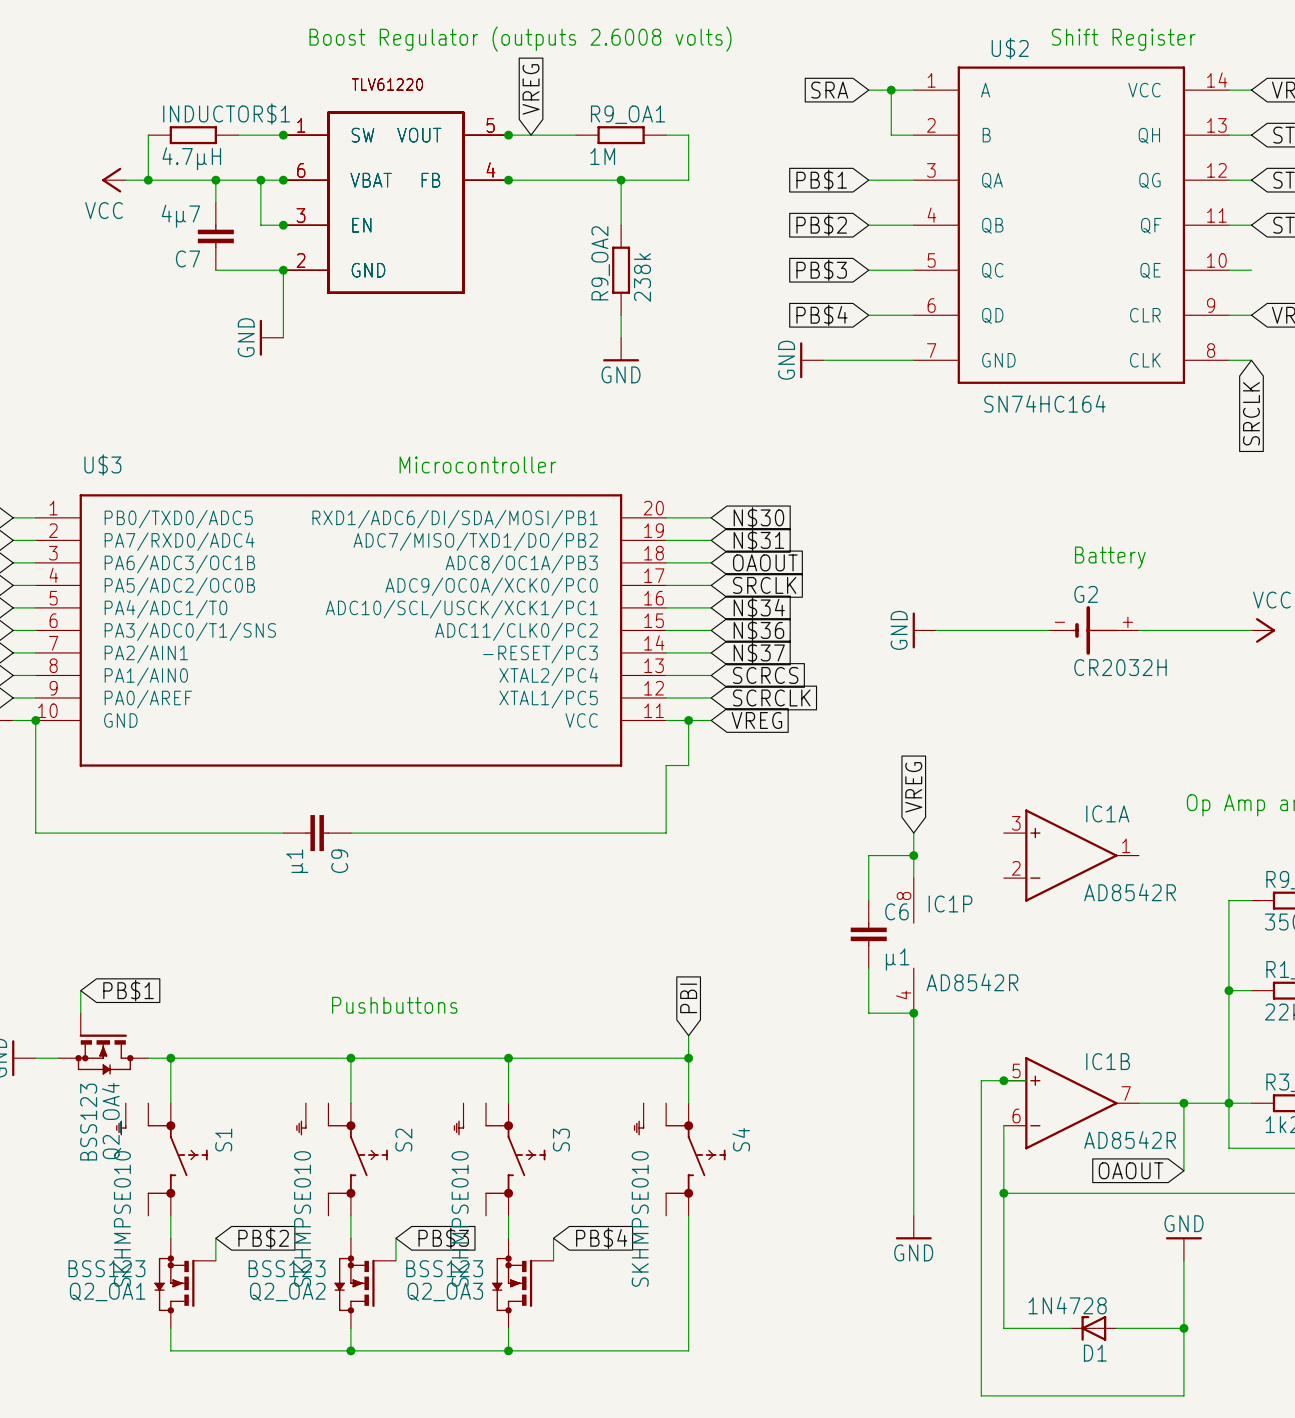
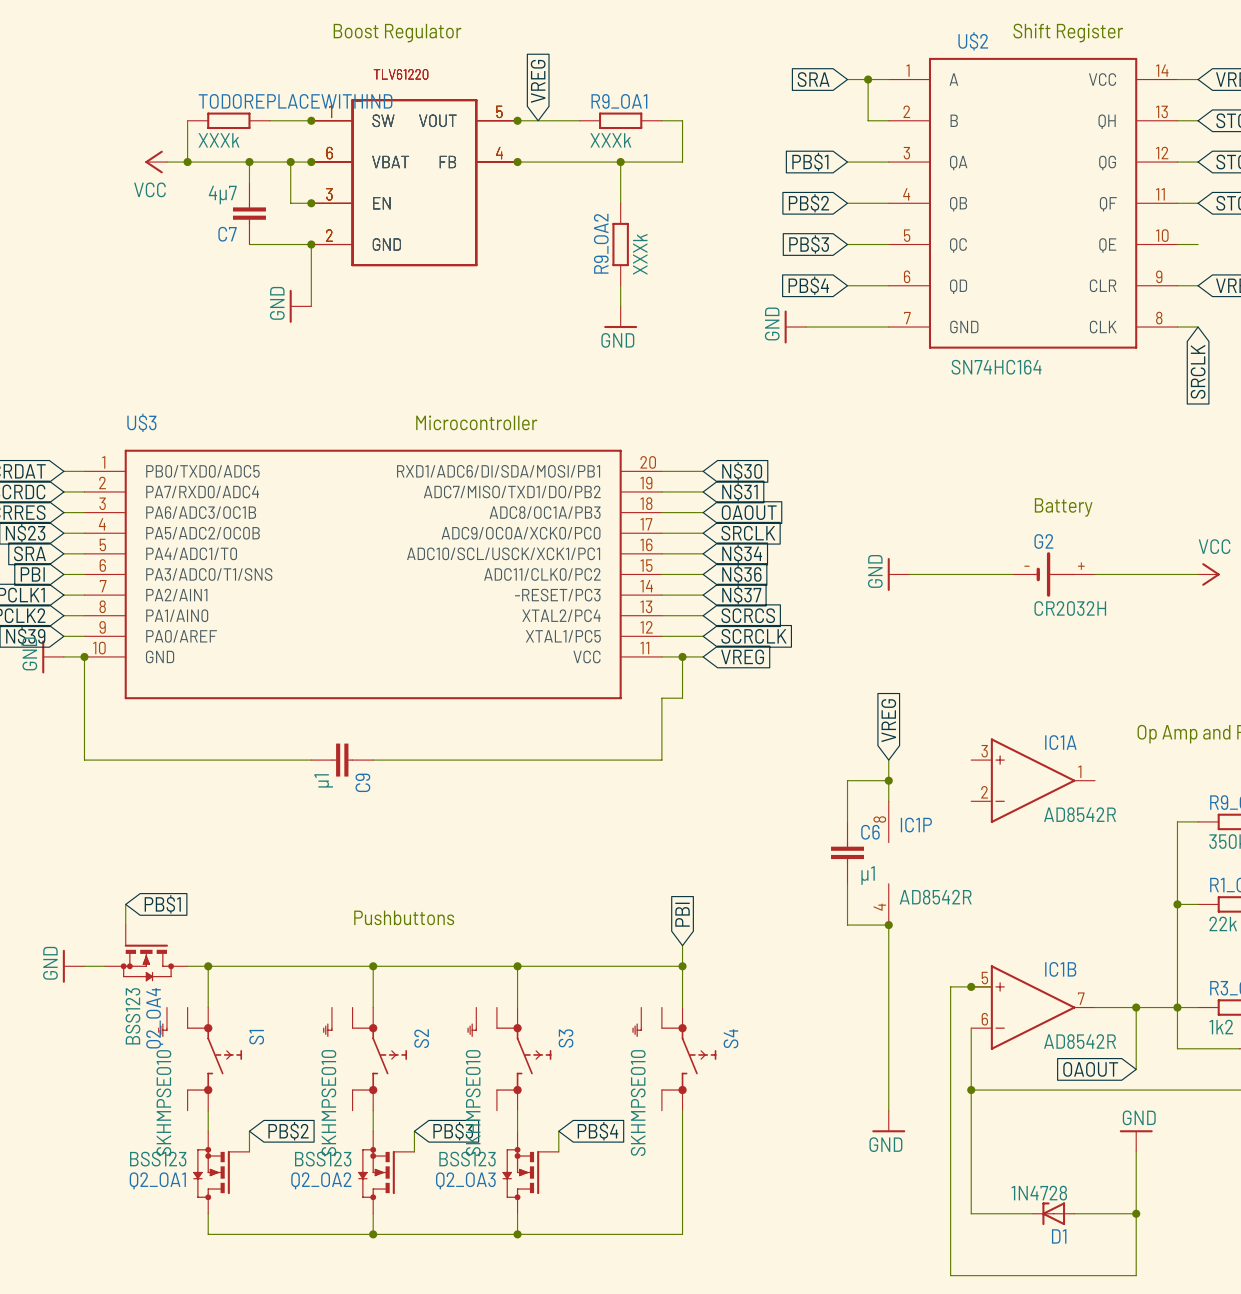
text: Boost Regulator (outputs 2.6008 volts) (520, 39) -> Boost Regulator (397, 33)
INDUCTOR$1 name: INDUCTOR$1 (226, 113) -> TODOREPLACEWITHIND (295, 101)
R9_OA1 value: 1M (602, 156) -> XXXk (610, 140)
INDUCTOR$1 value: 4.7µH (191, 158) -> XXXk (219, 140)
R9_OA2 value: 238k (642, 277) -> XXXk (640, 254)

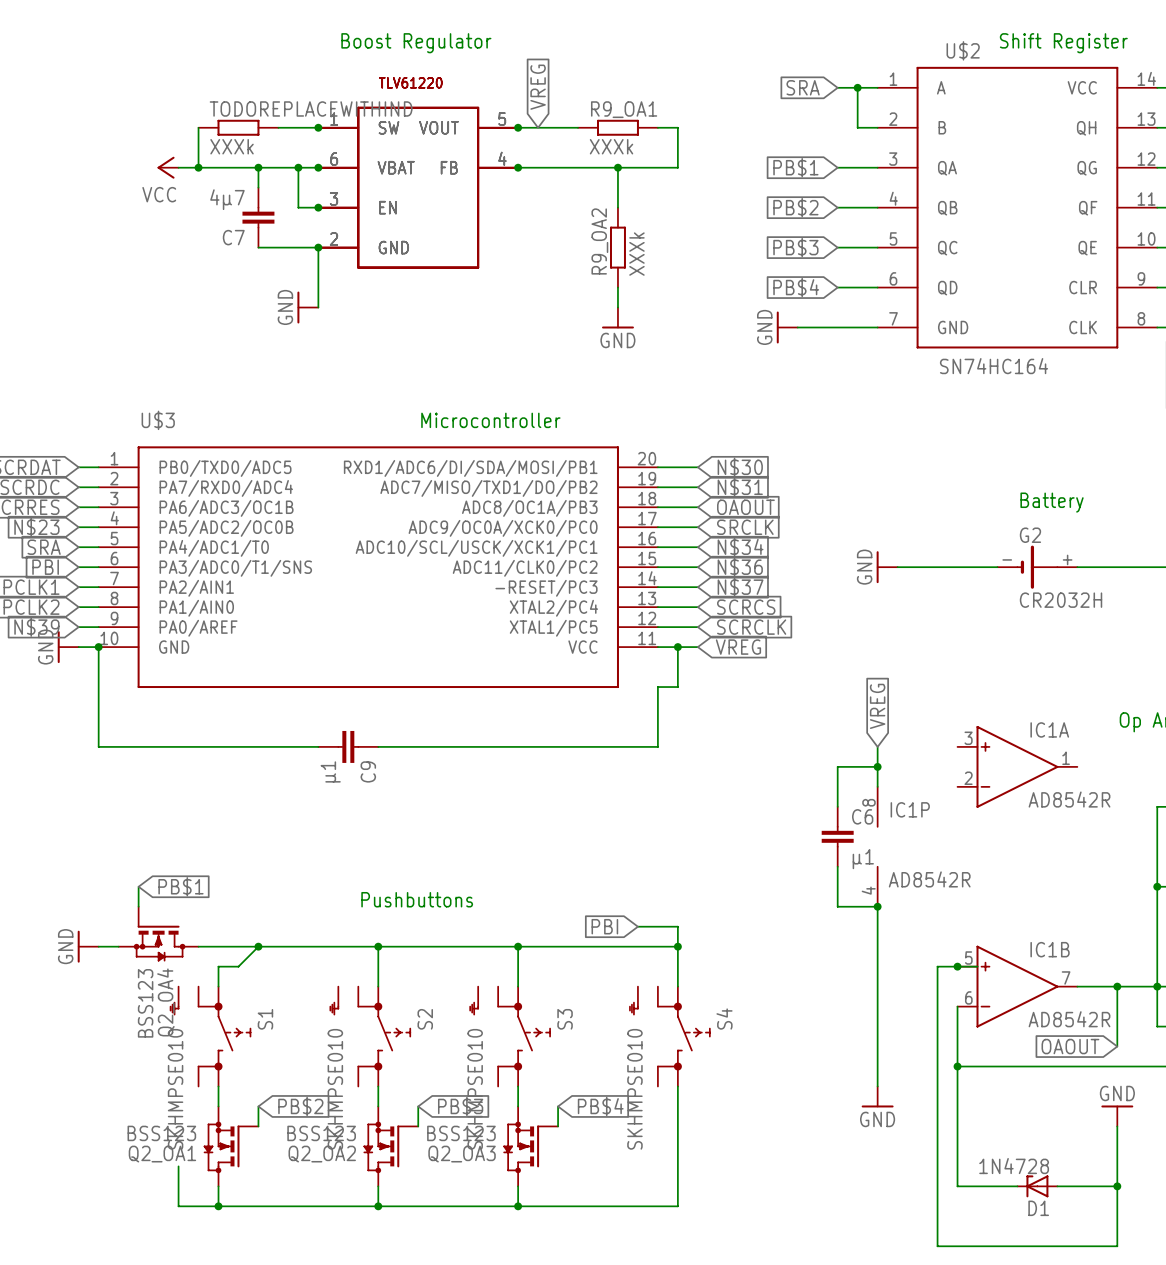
global label rotation: 0° (682, 914) -> 90° counterclockwise (604, 926)
global label position: PBI (682, 914) -> PBI (604, 926)
wire: none -> (637, 926) (677, 926)
wire: (208, 966) (208, 986) -> (258, 946) (238, 966) (218, 966)
junction position: (208, 966) -> (258, 946)
wire: none -> (178, 1166) (178, 1206) (218, 1206)
junction: none -> (218, 1206)

